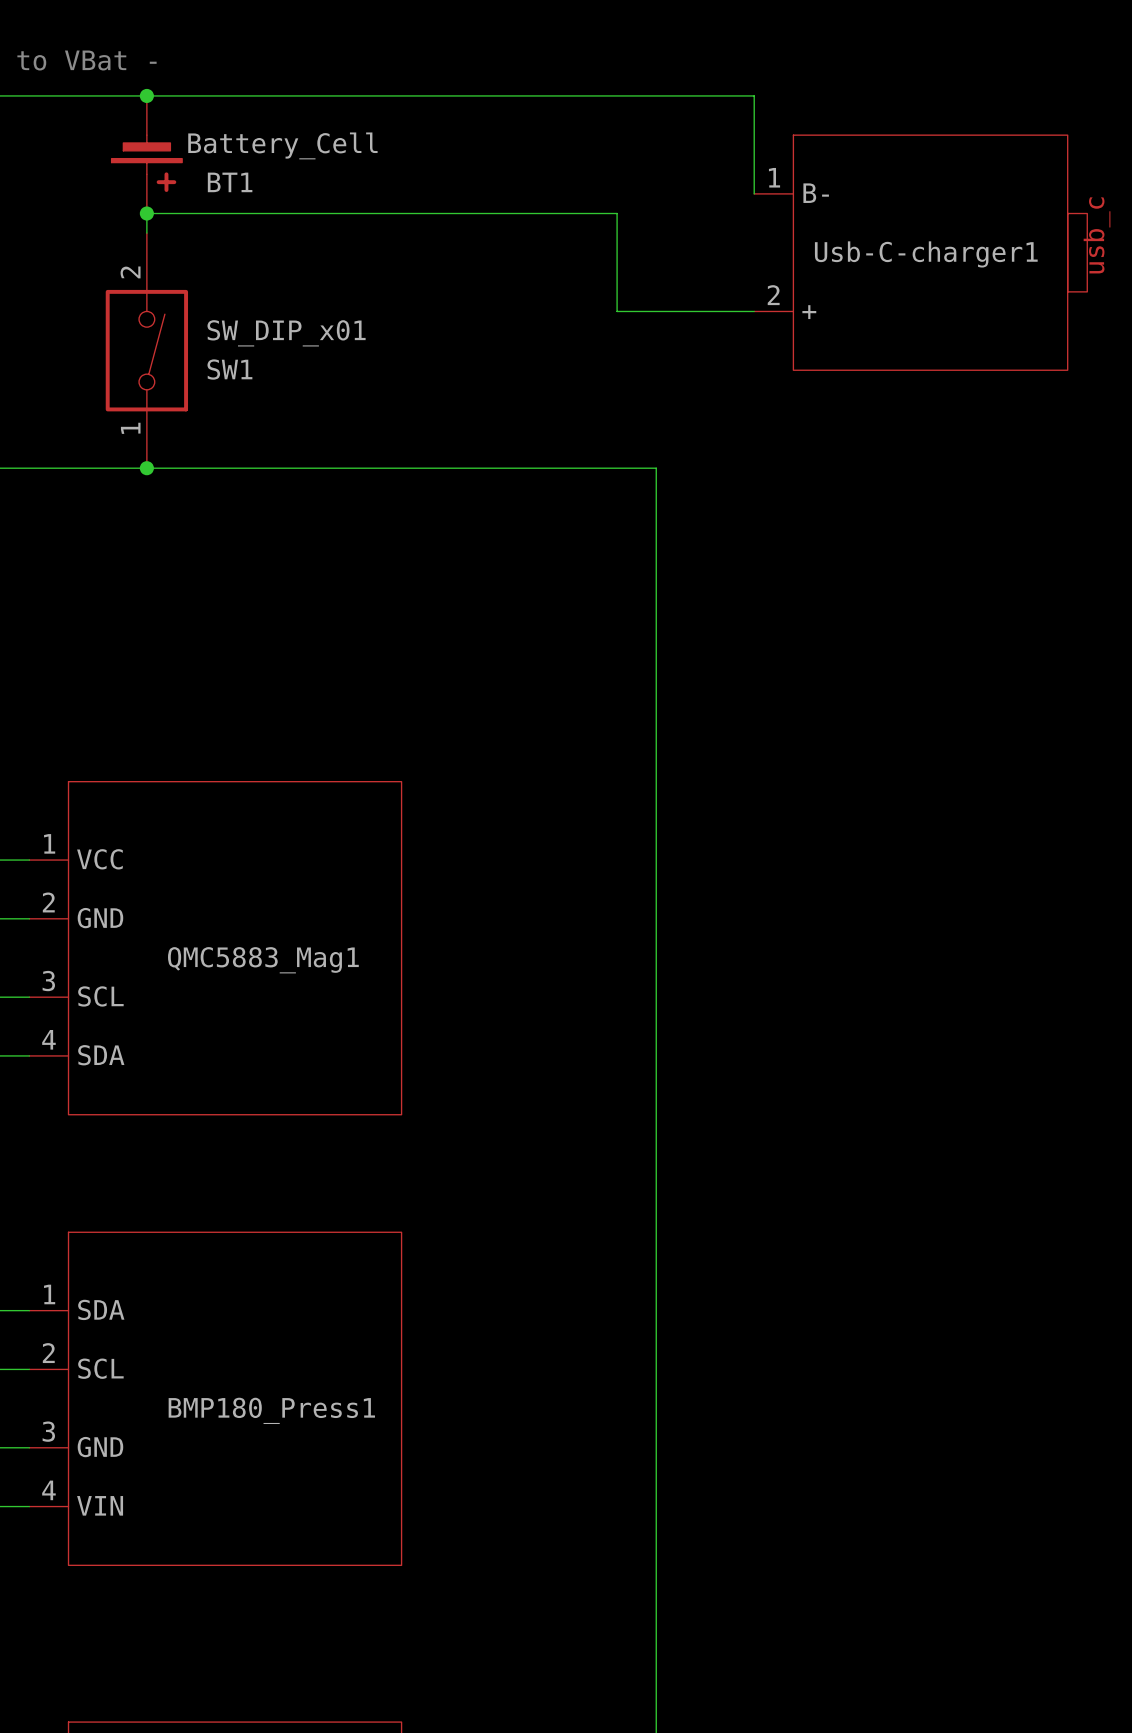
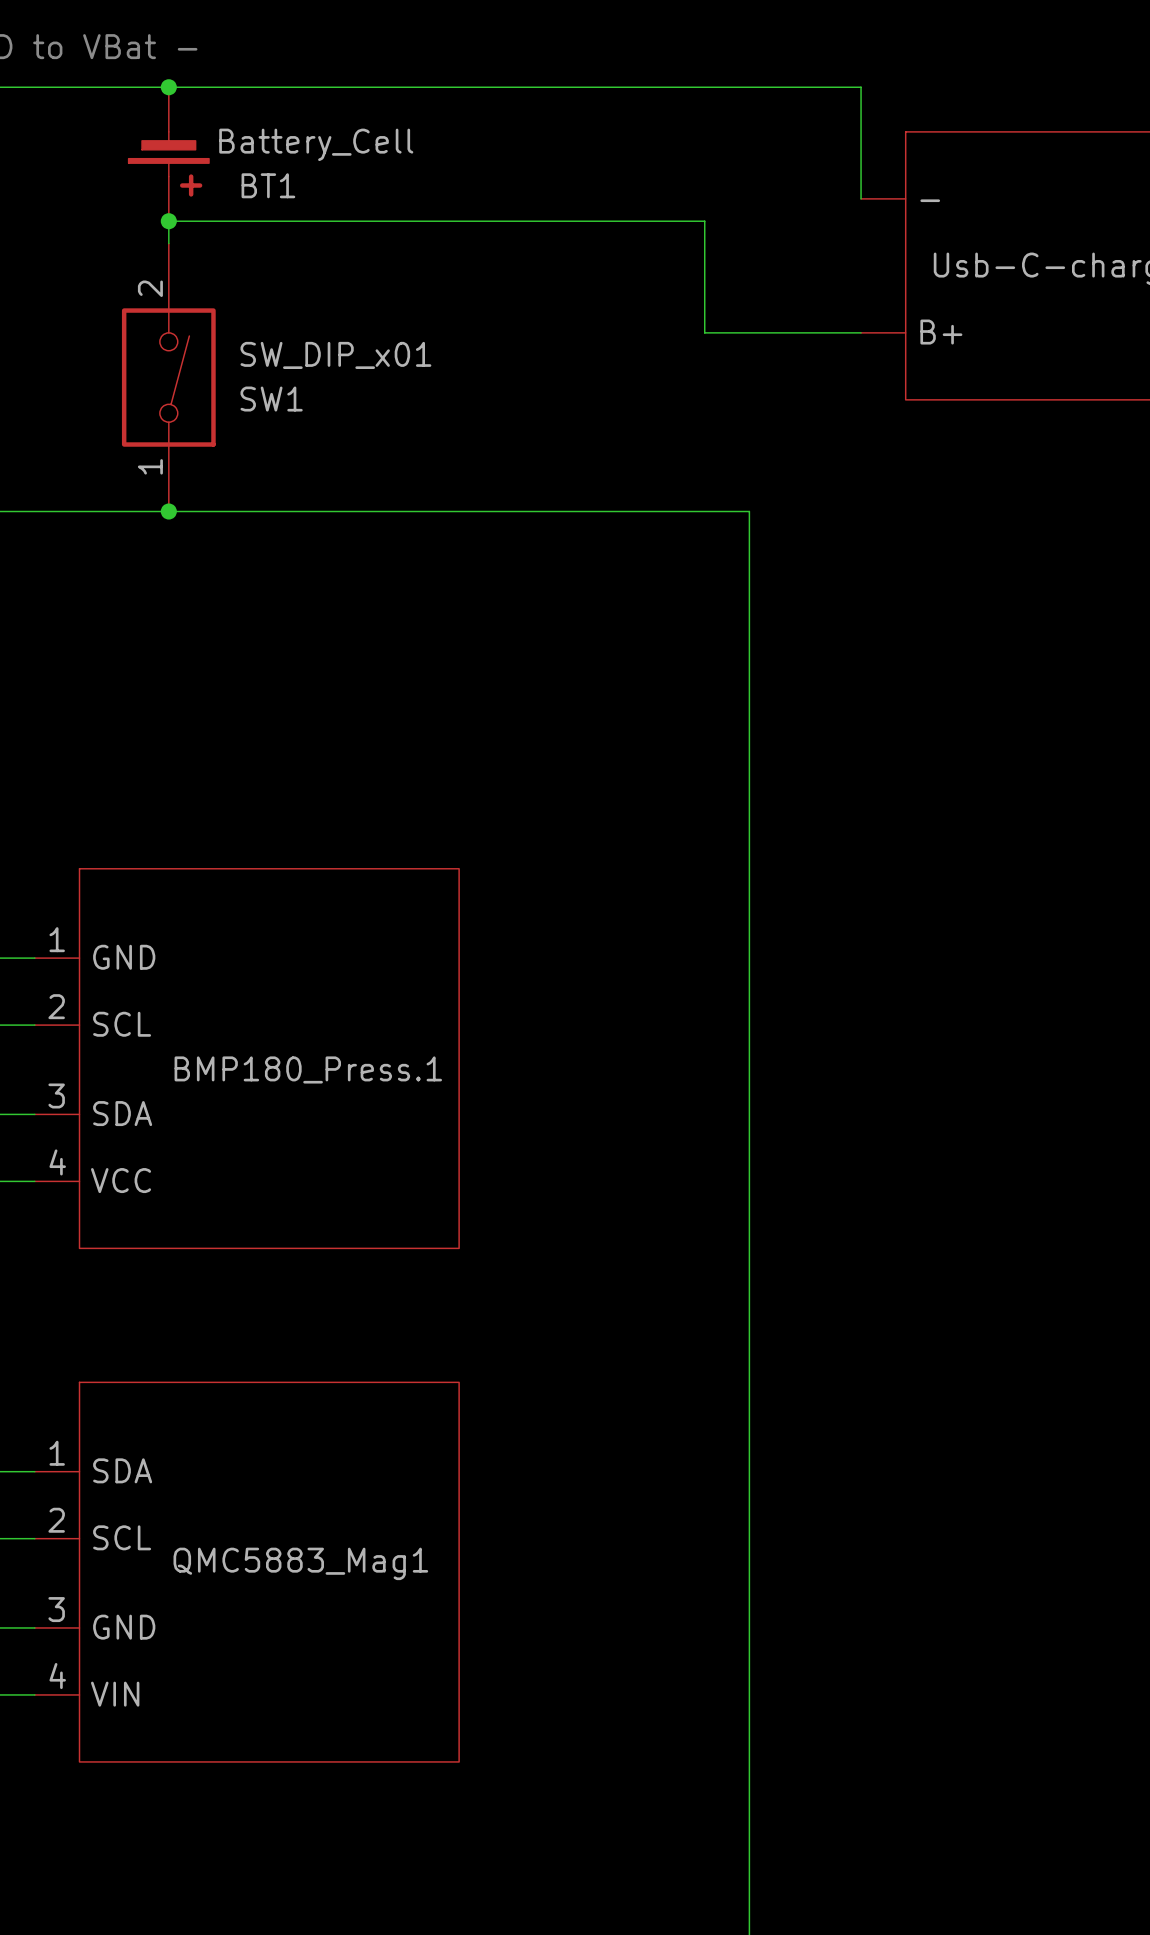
Usb-C-charger1 pin number: 1 (774, 177) -> none
Usb-C-charger1 pin name: B- (816, 193) -> - (930, 200)
Usb-C-charger1 pin number: 2 (773, 295) -> none
Usb-C-charger1 pin name: + (809, 312) -> B+ (941, 332)
QMC5883_Mag1 pin name: VCC (99, 859) -> GND (124, 957)
QMC5883_Mag1 pin name: GND (100, 918) -> SCL (122, 1024)
QMC5883_Mag1 name: QMC5883_Mag1 (263, 960) -> BMP180_Press.1 (308, 1069)
QMC5883_Mag1 pin name: SCL (100, 996) -> SDA (122, 1113)
QMC5883_Mag1 pin name: SDA (101, 1055) -> VCC (121, 1180)
BMP180_Press1 name: BMP180_Press1 (271, 1410) -> QMC5883_Mag1 (300, 1563)

